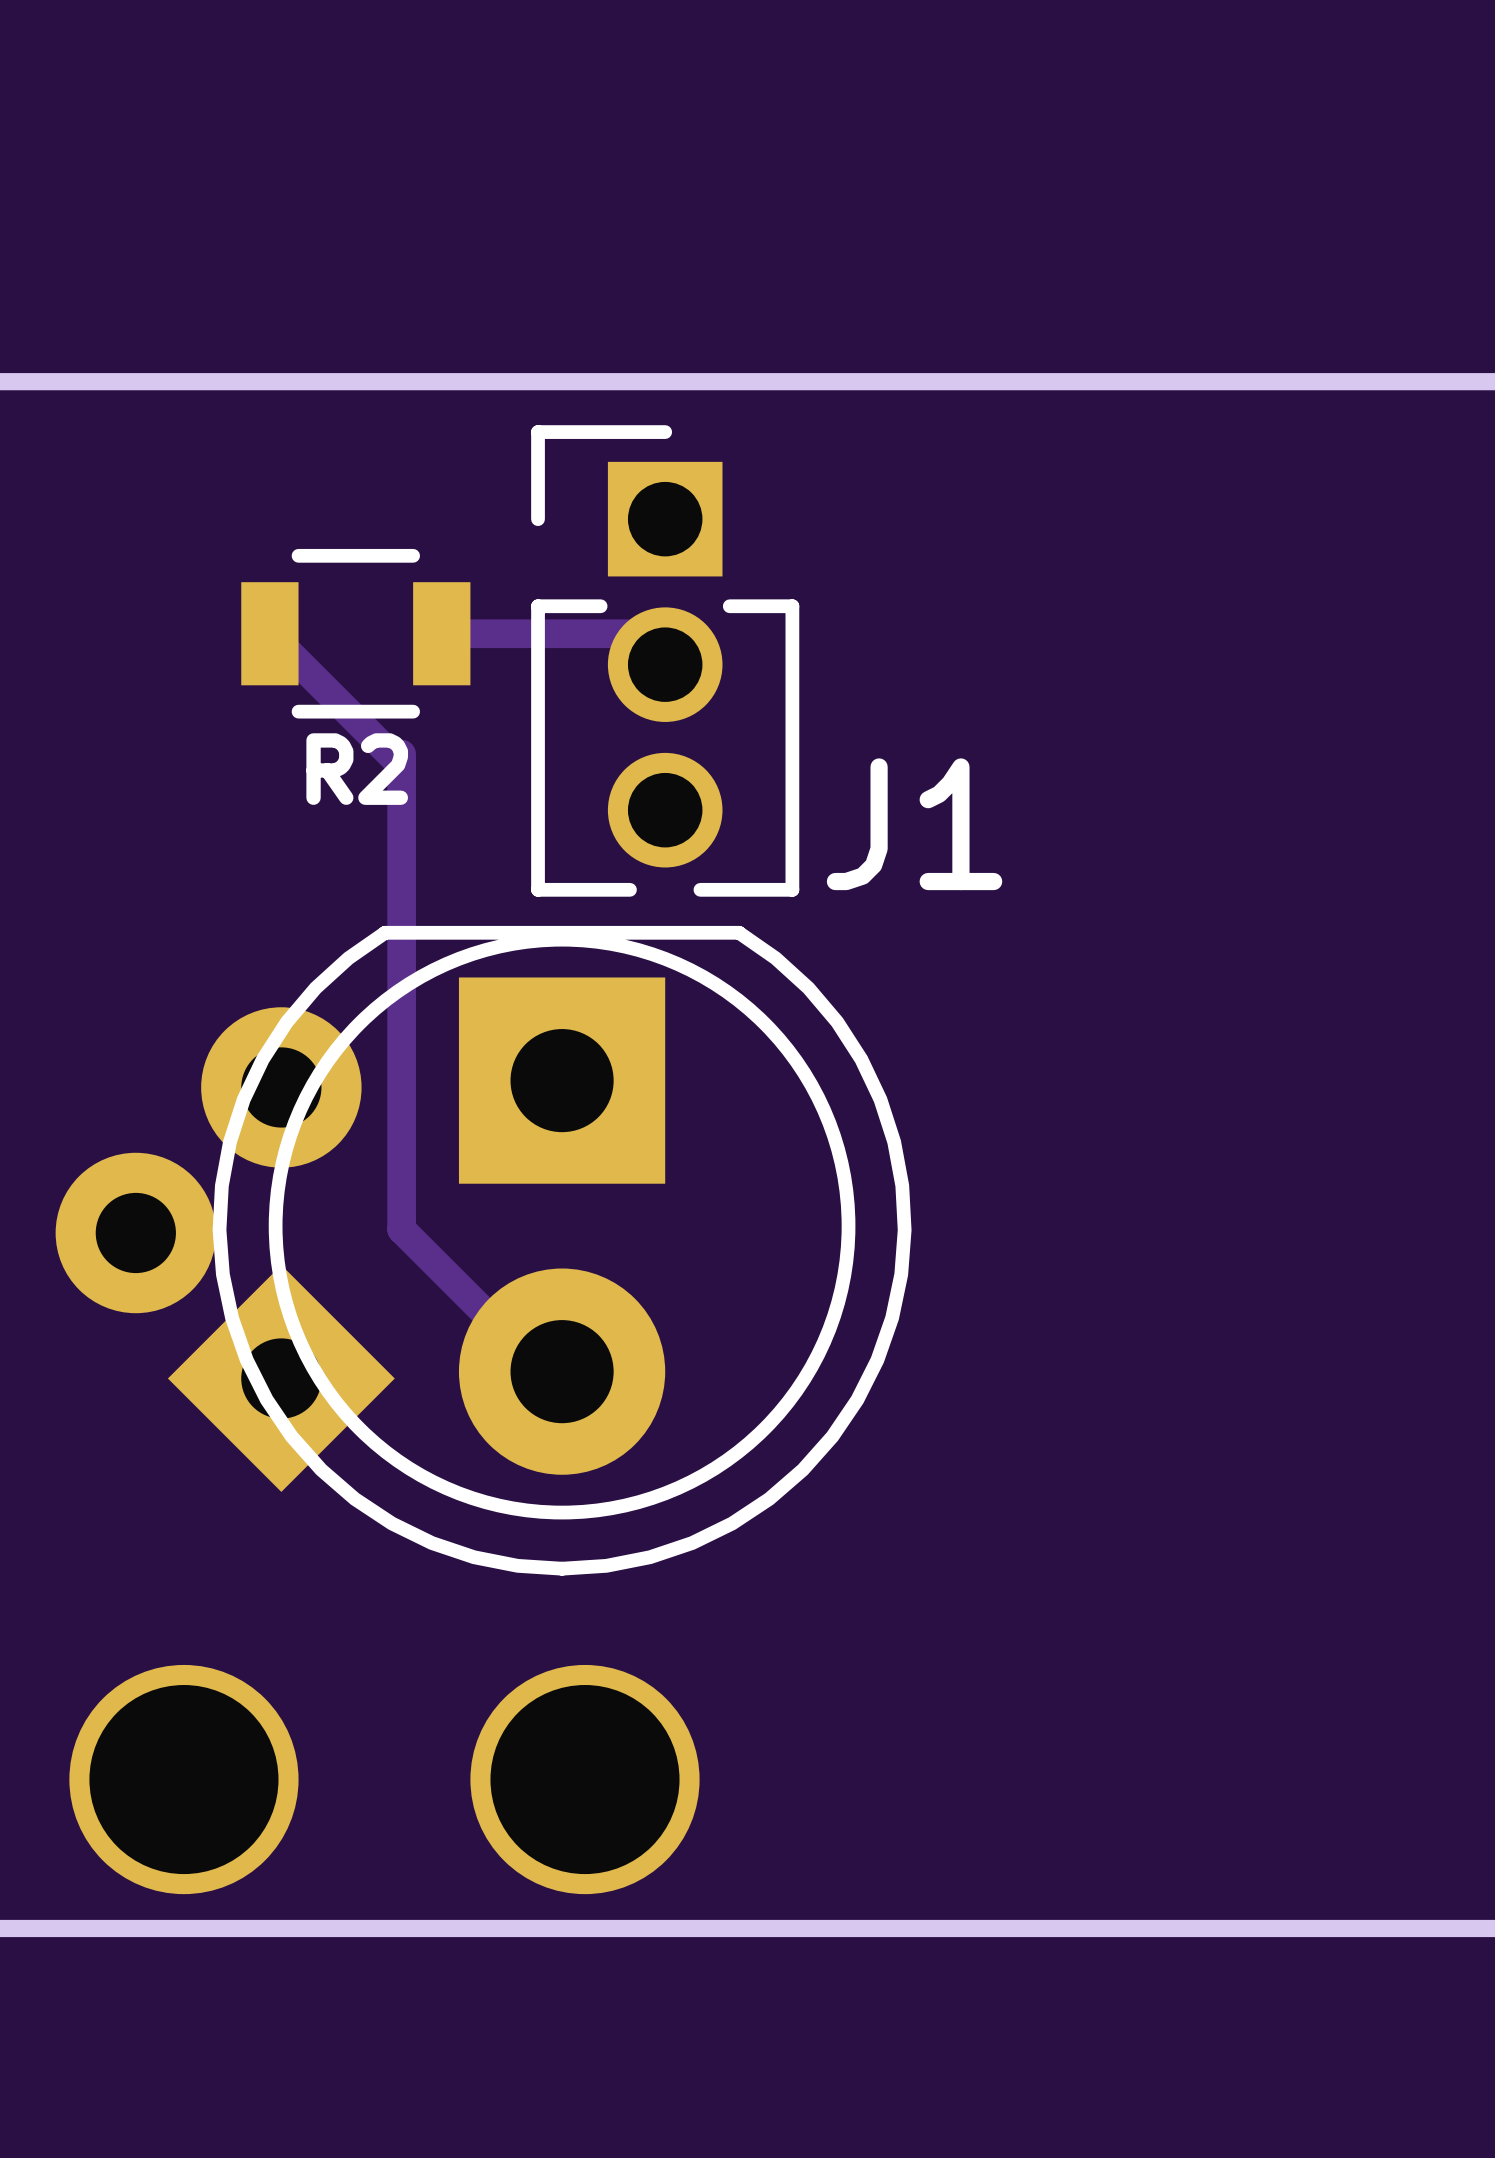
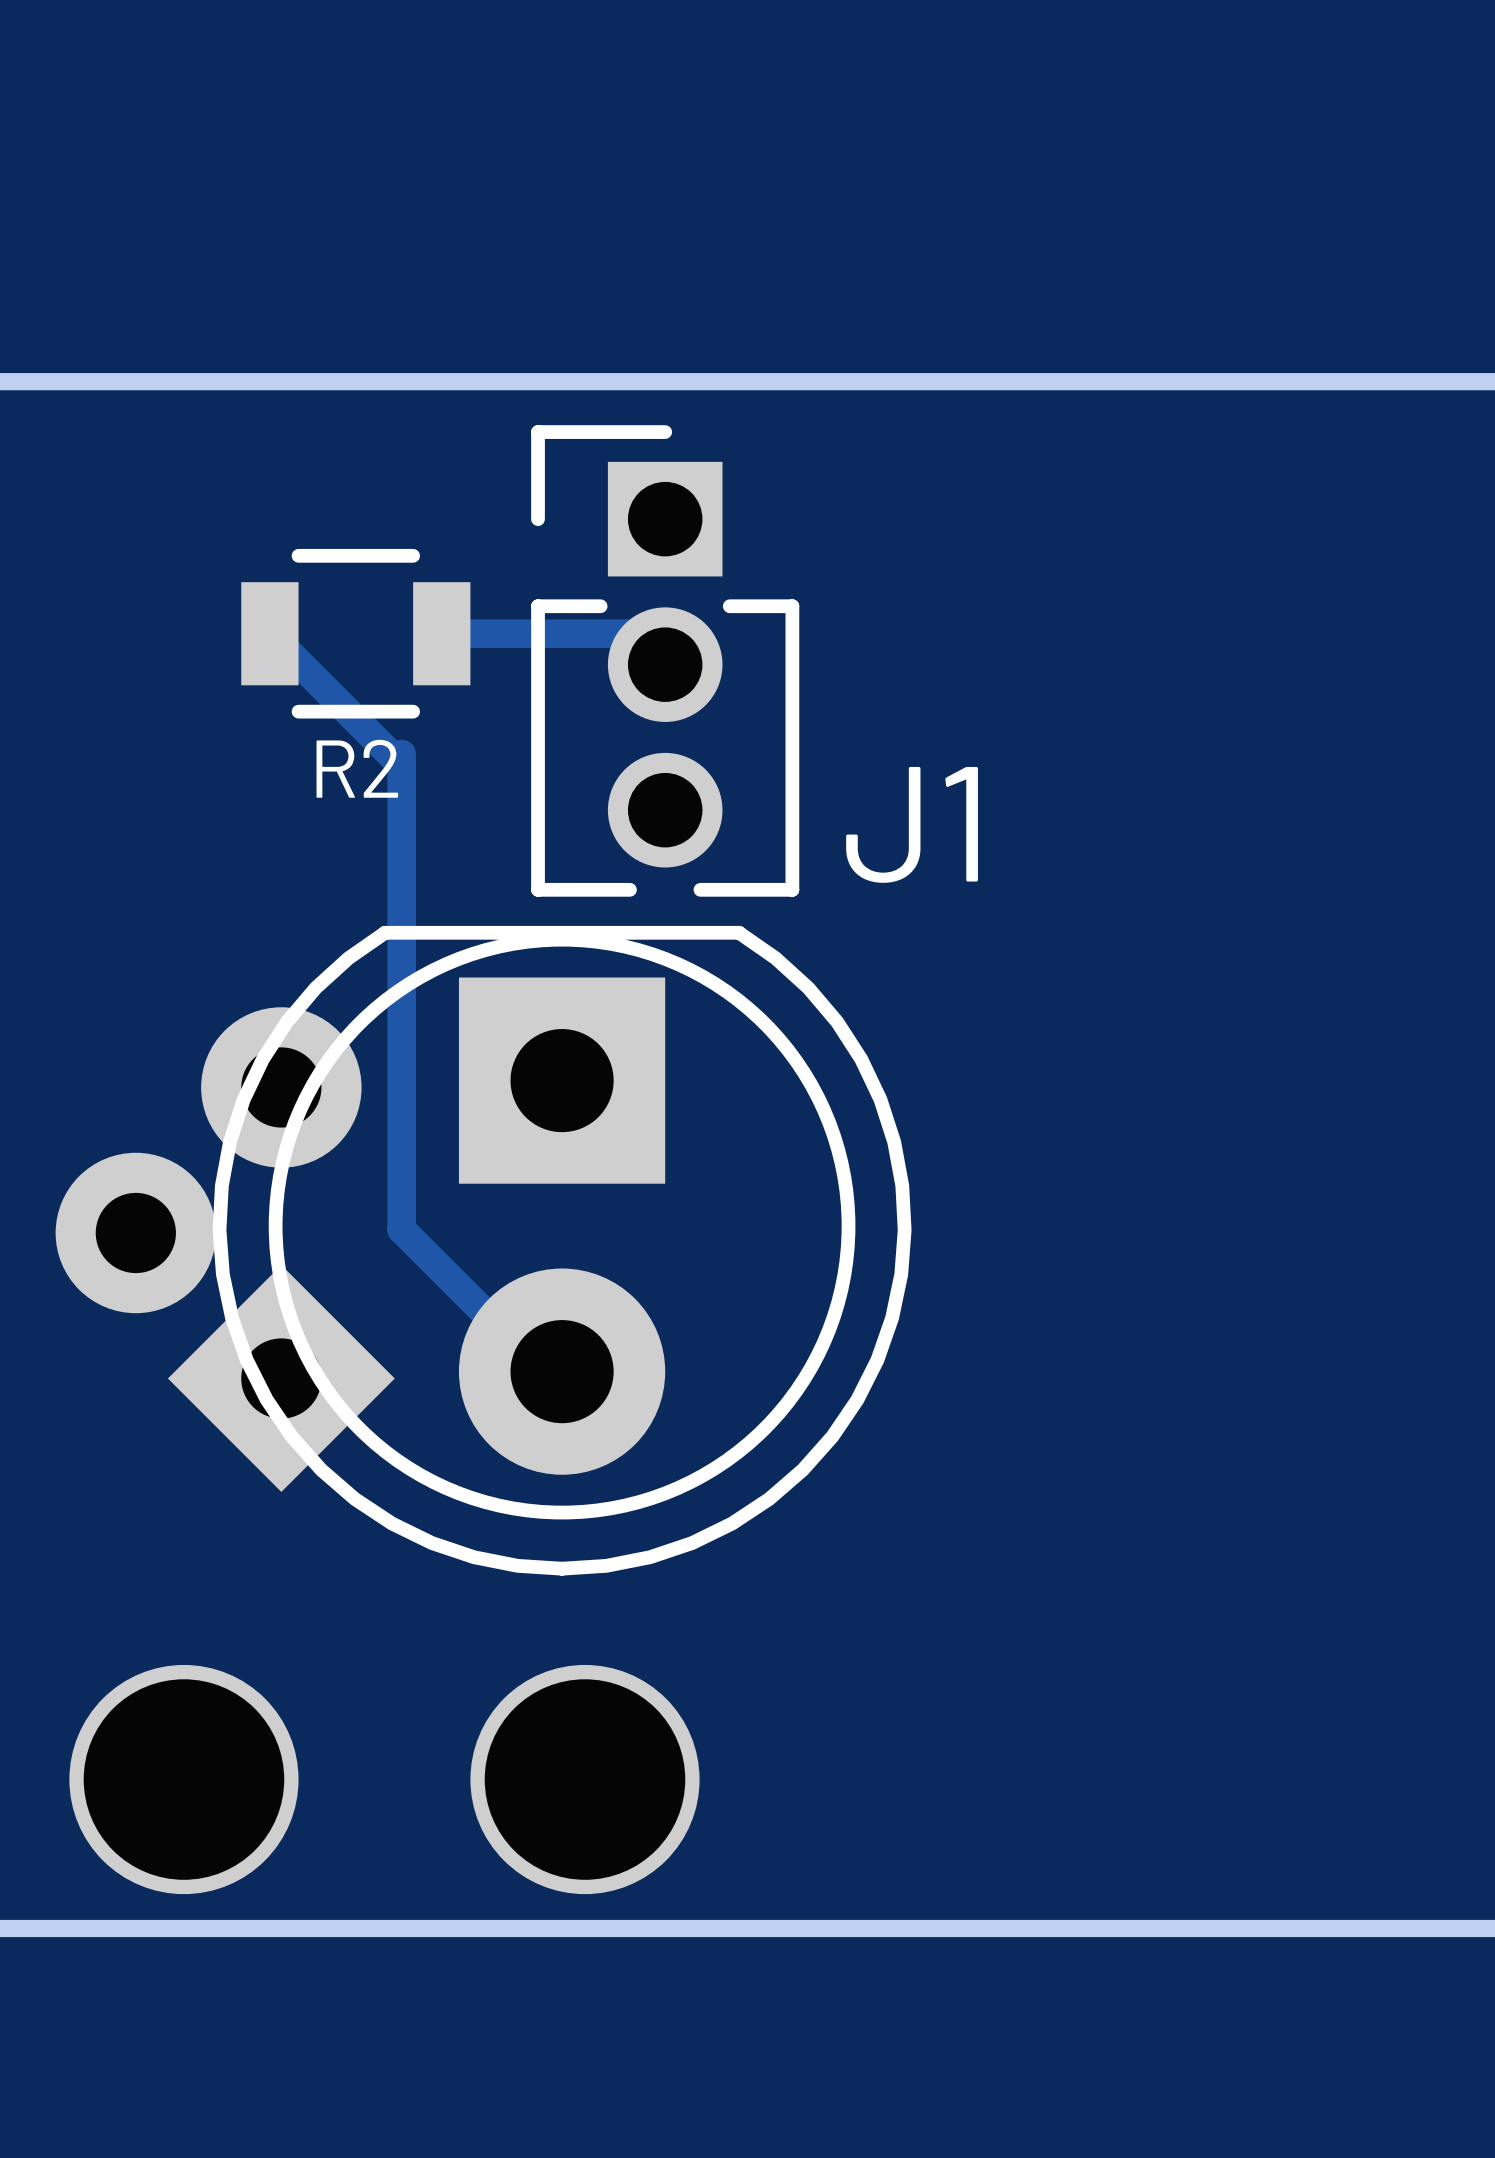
part footprint: [69, 1664, 299, 1895] -> [69, 1664, 299, 1895]
part footprint: [470, 1664, 700, 1895] -> [470, 1664, 700, 1895]

